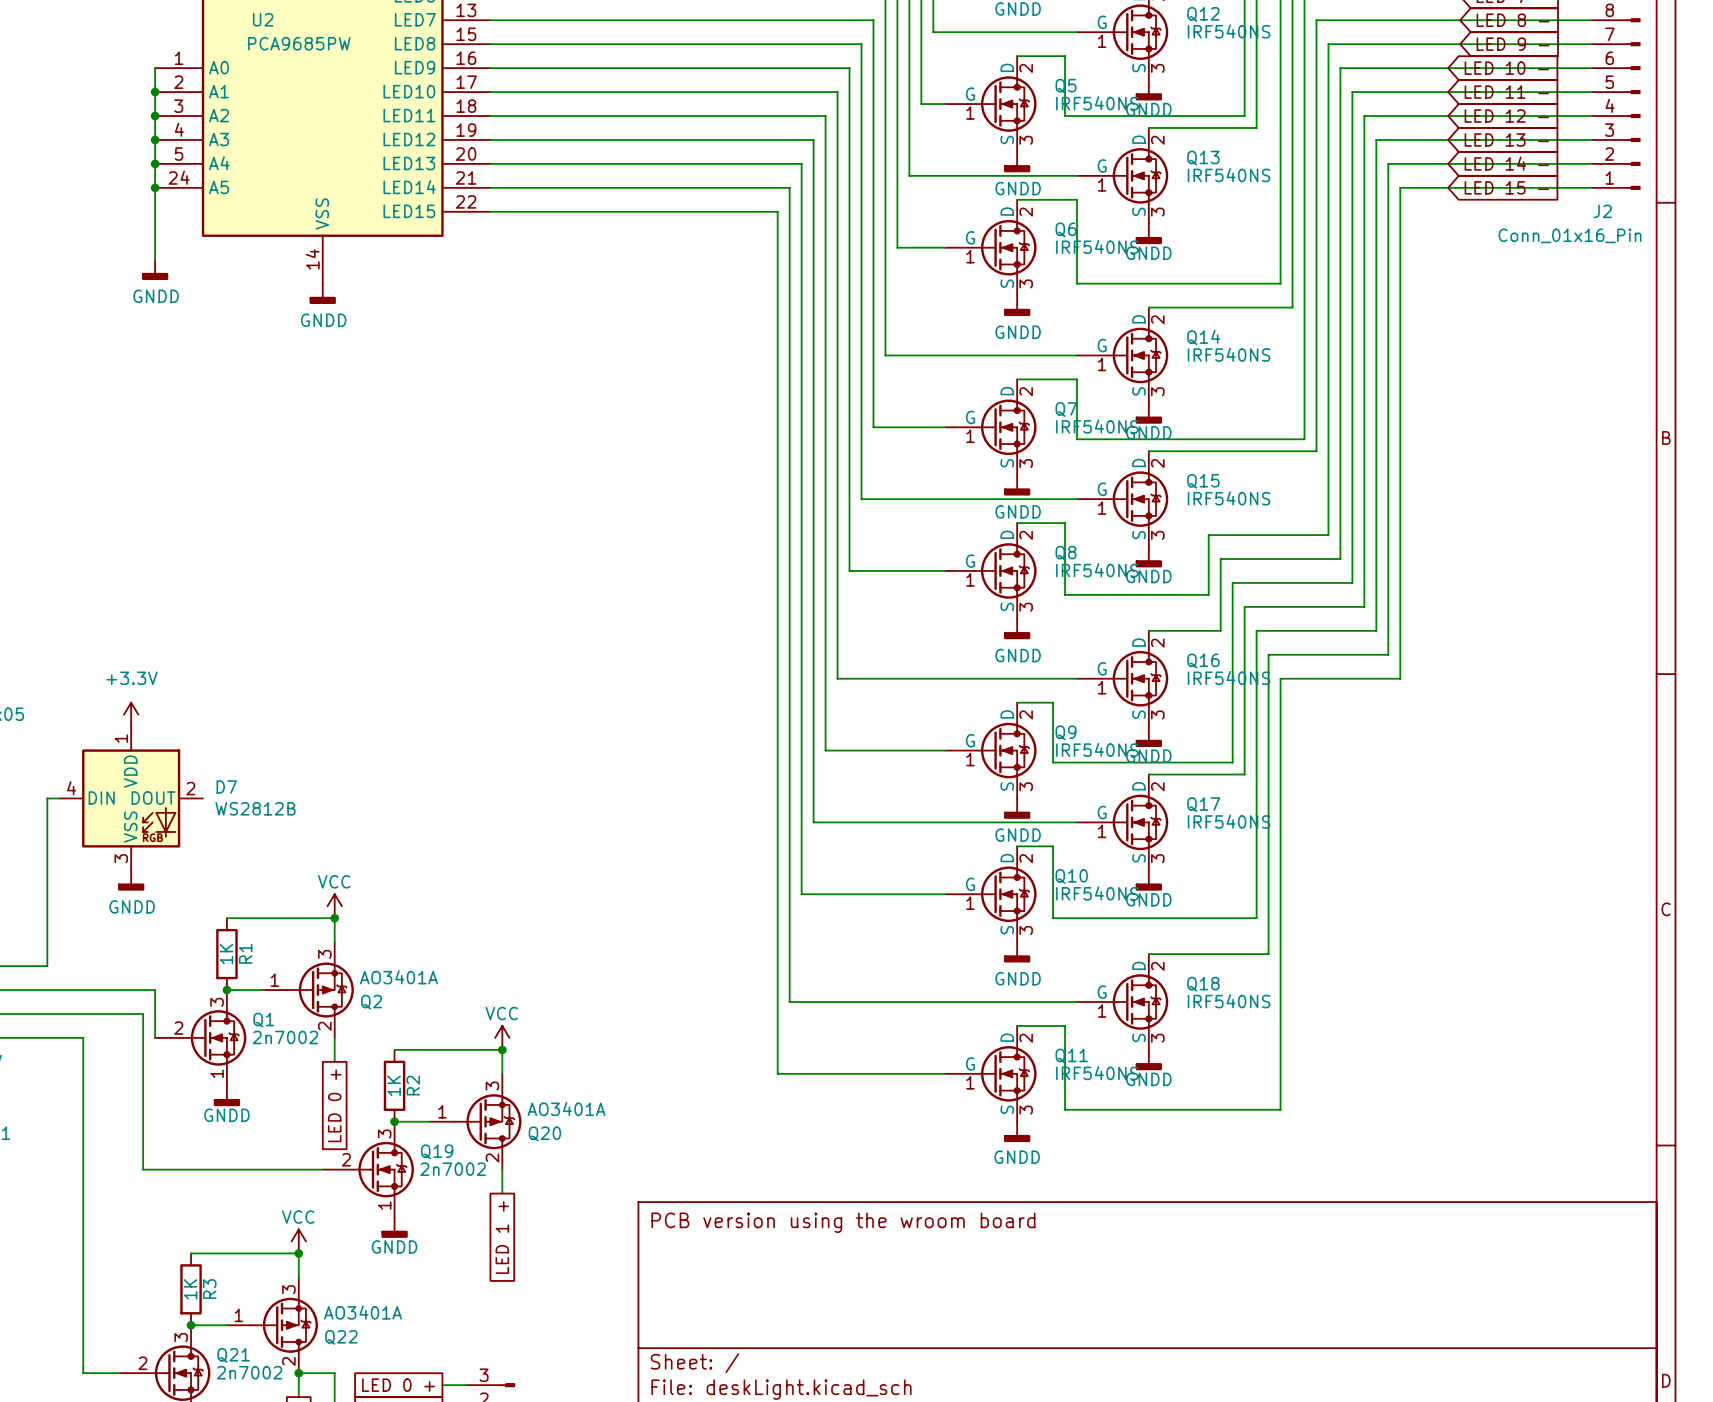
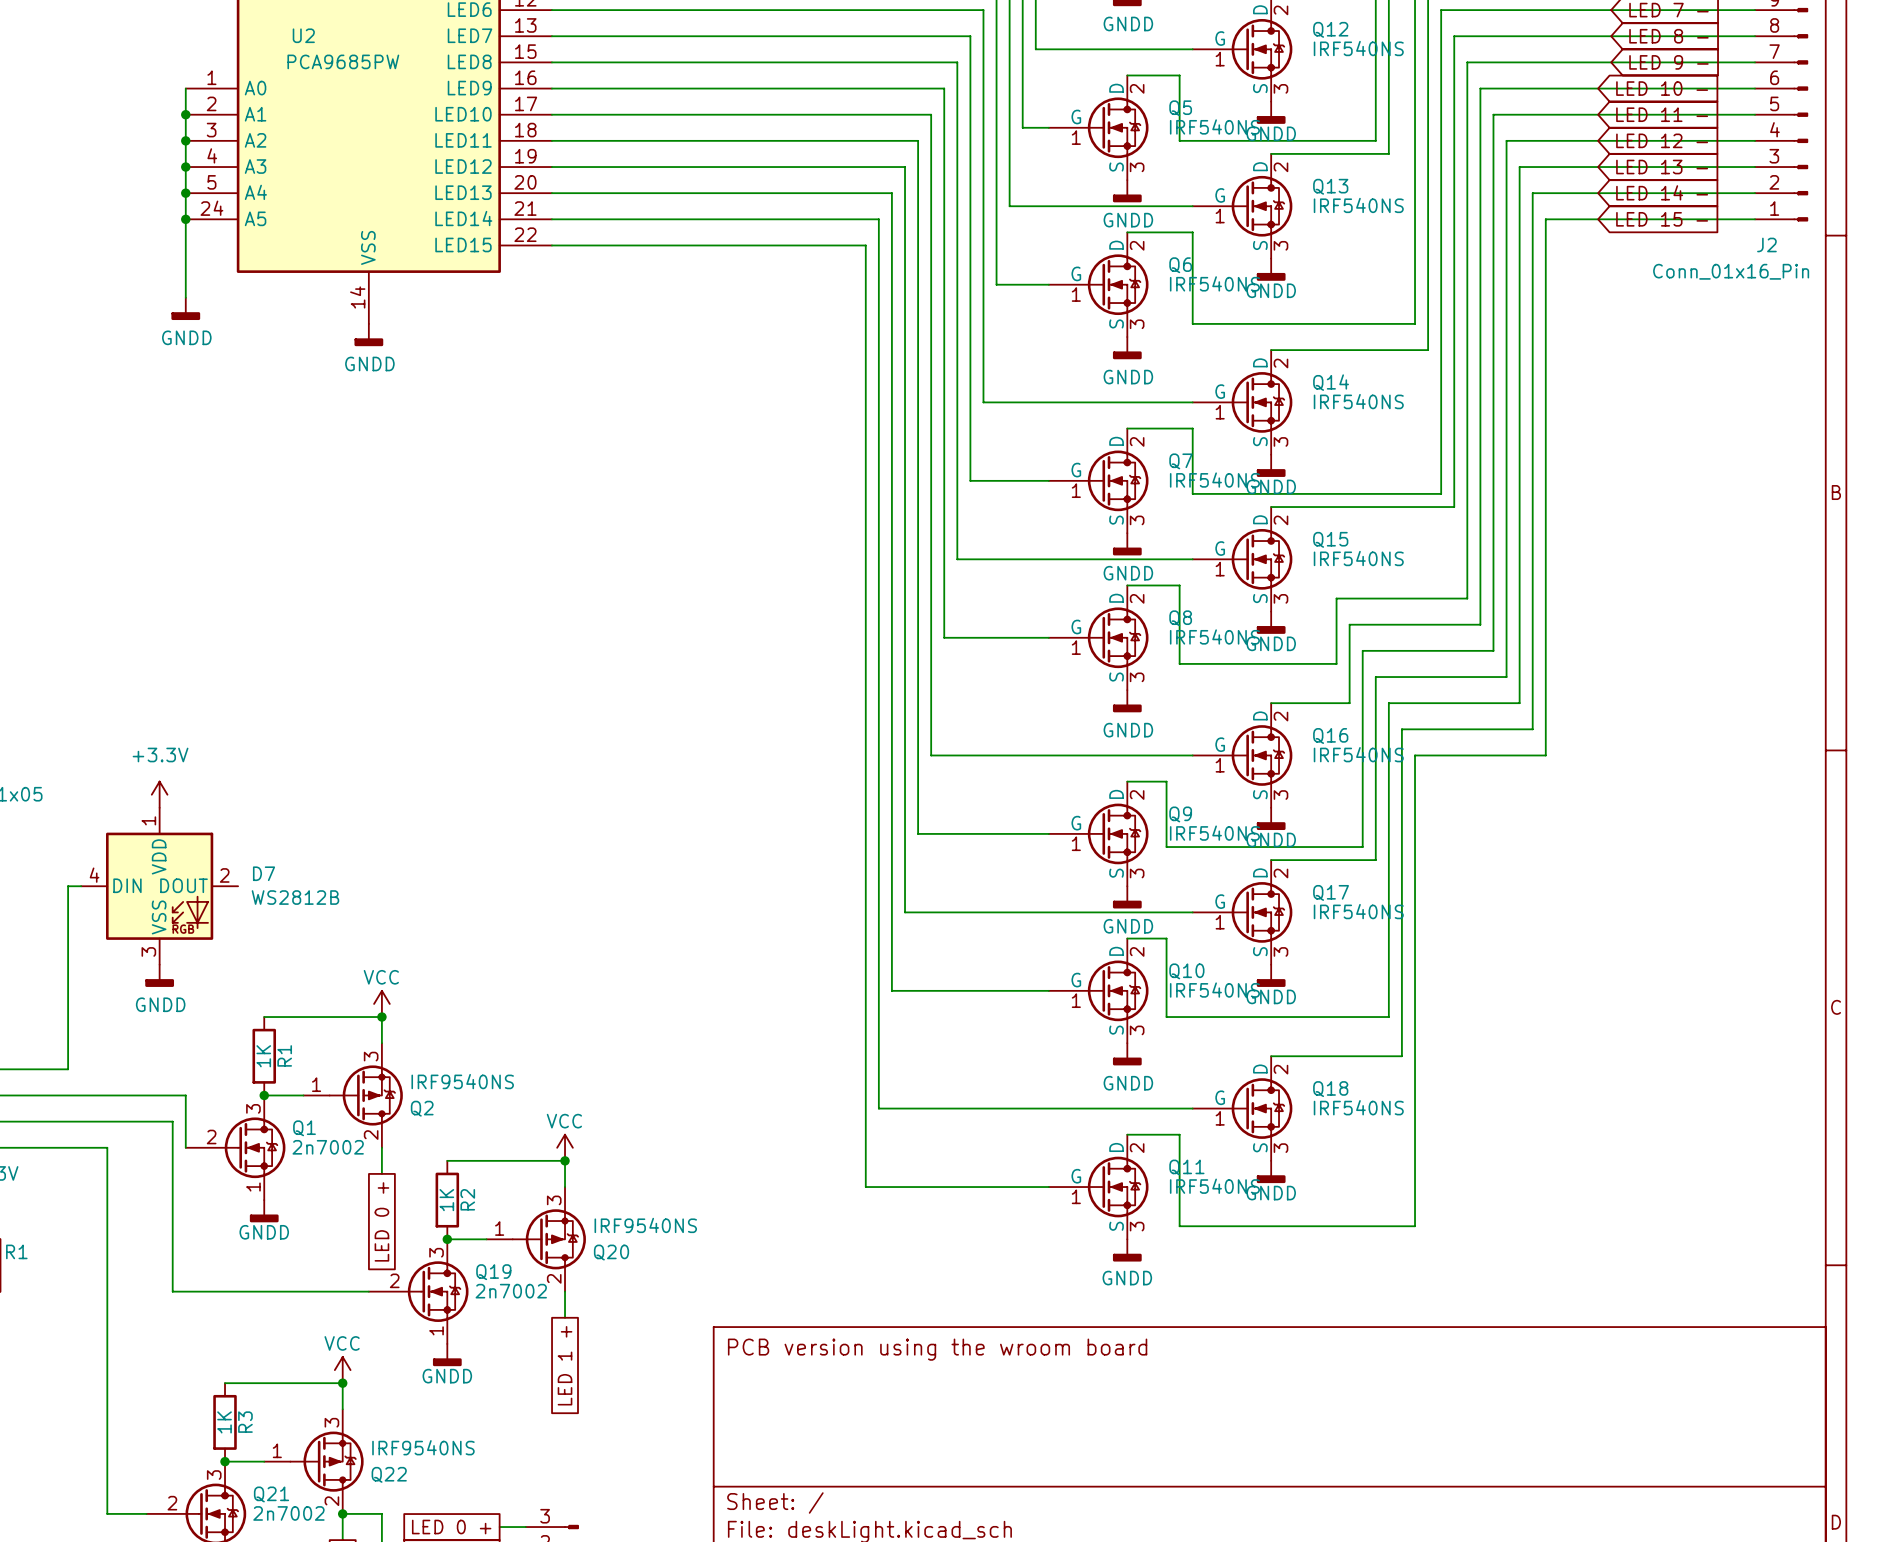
Q2 value: AO3401A (398, 977) -> IRF9540NS (462, 1081)
Q20 value: AO3401A (566, 1109) -> IRF9540NS (645, 1225)
Q22 value: AO3401A (363, 1312) -> IRF9540NS (423, 1447)

